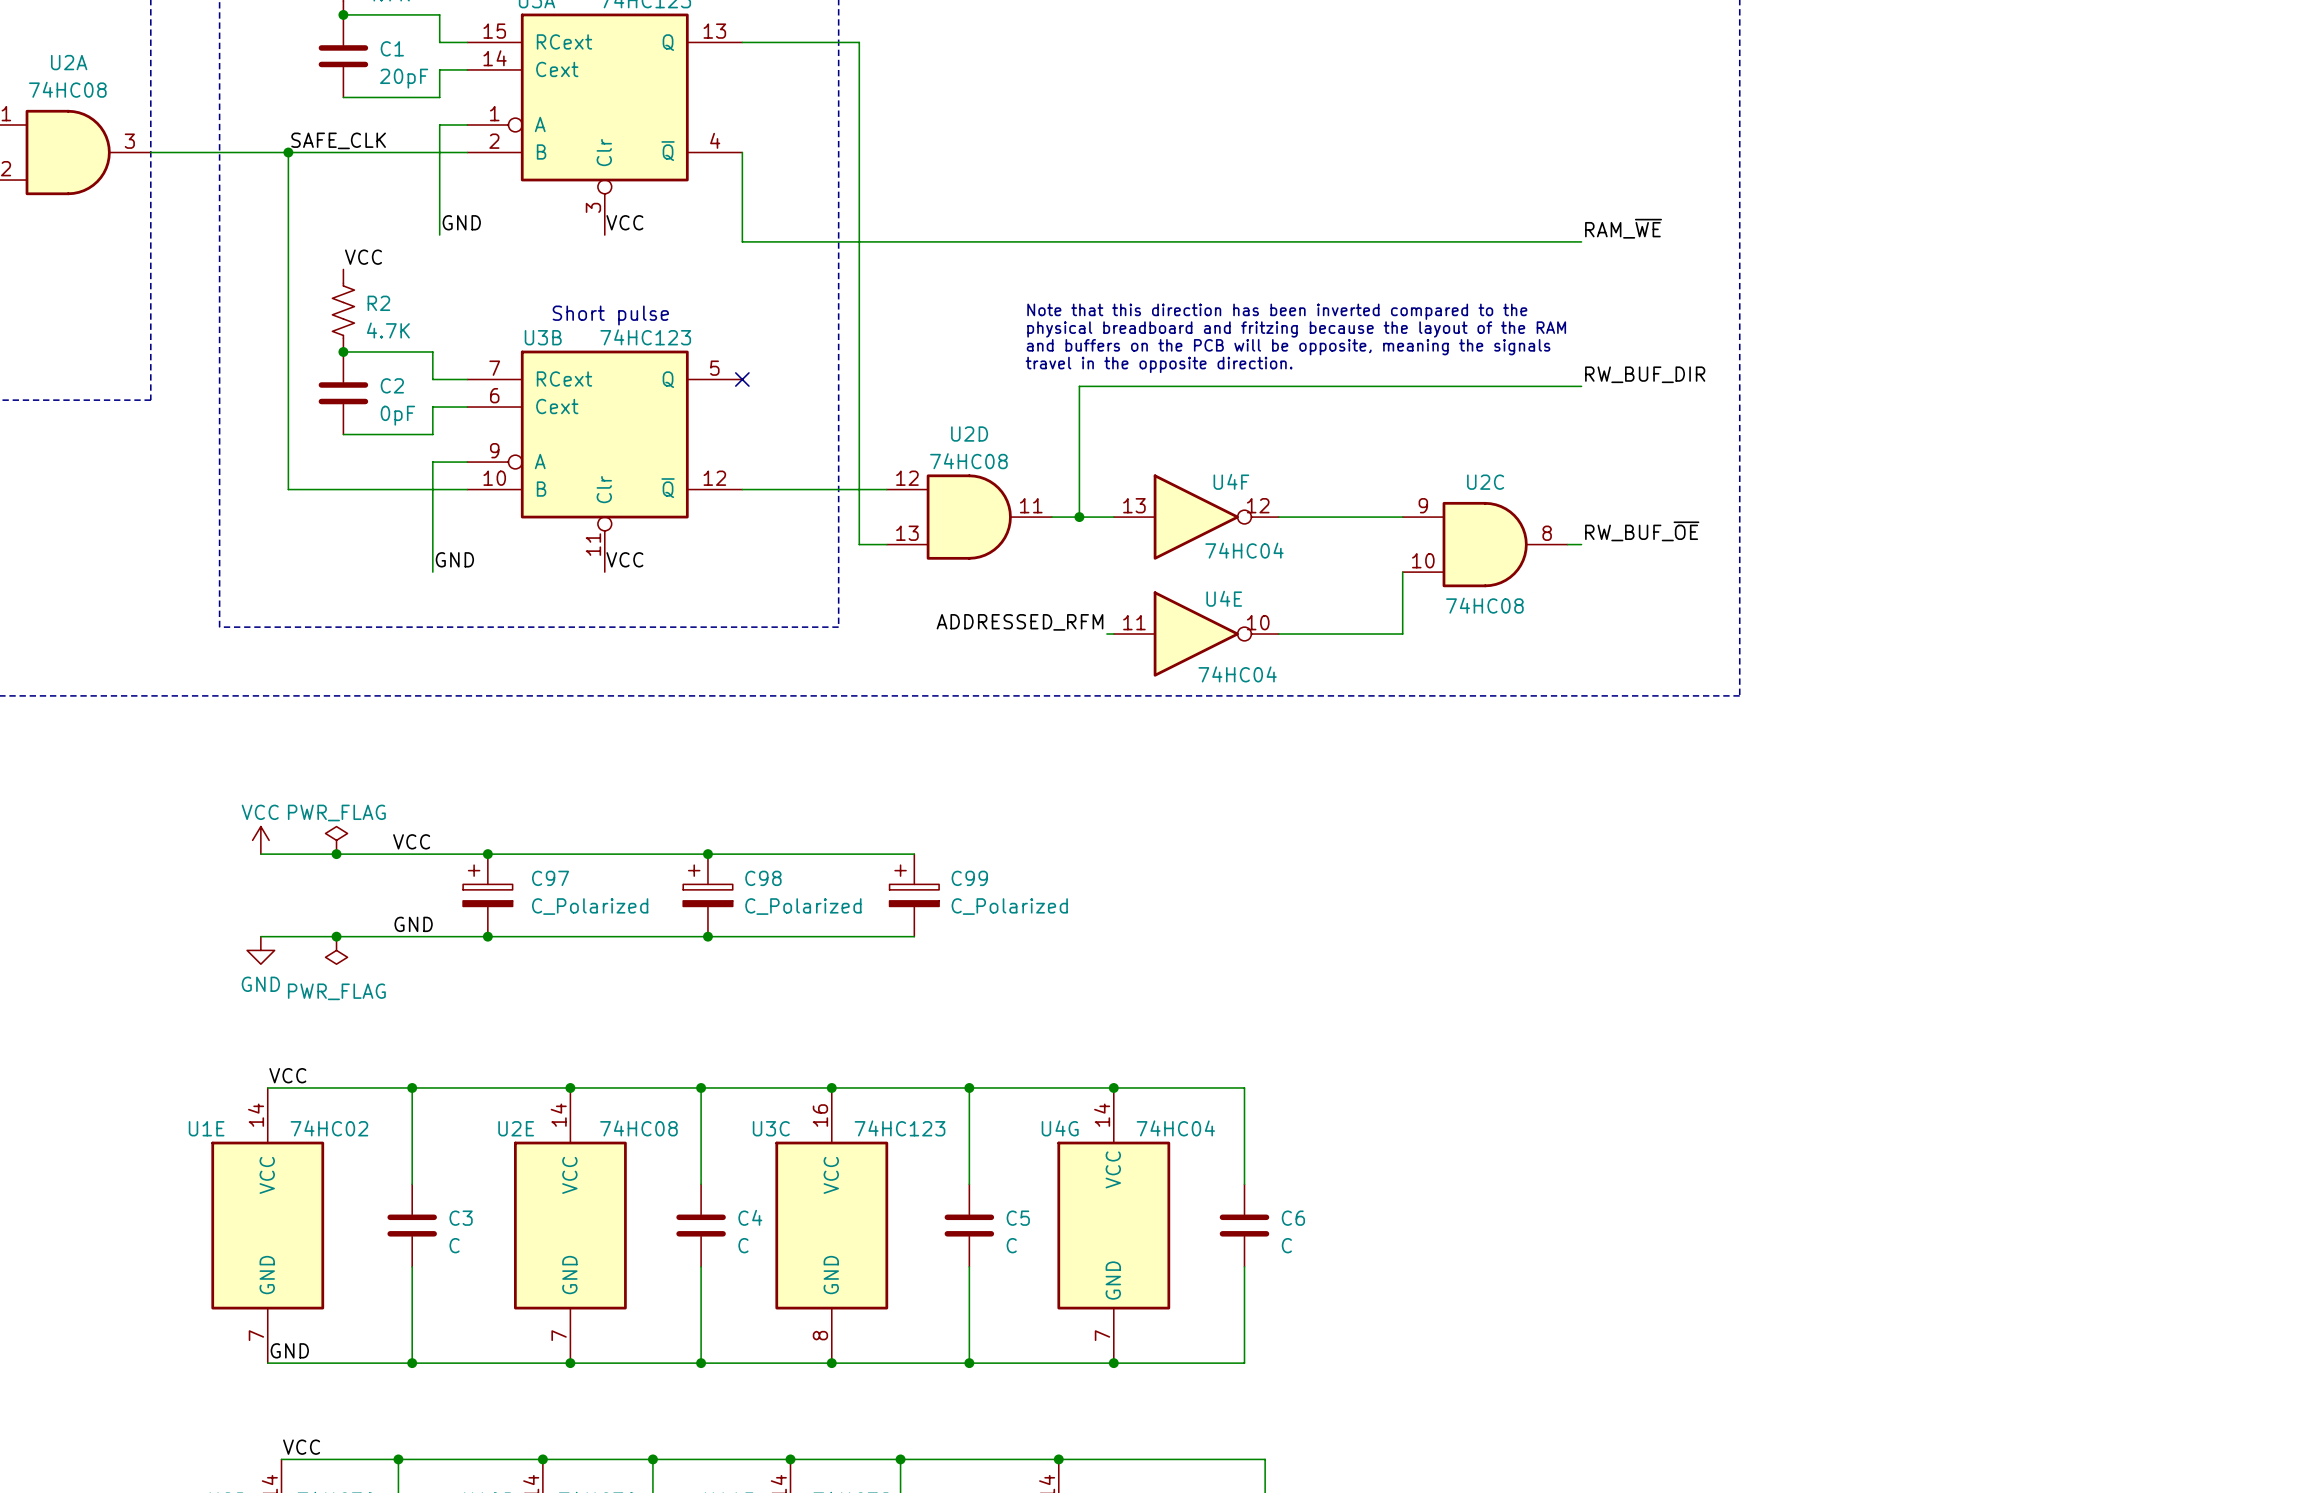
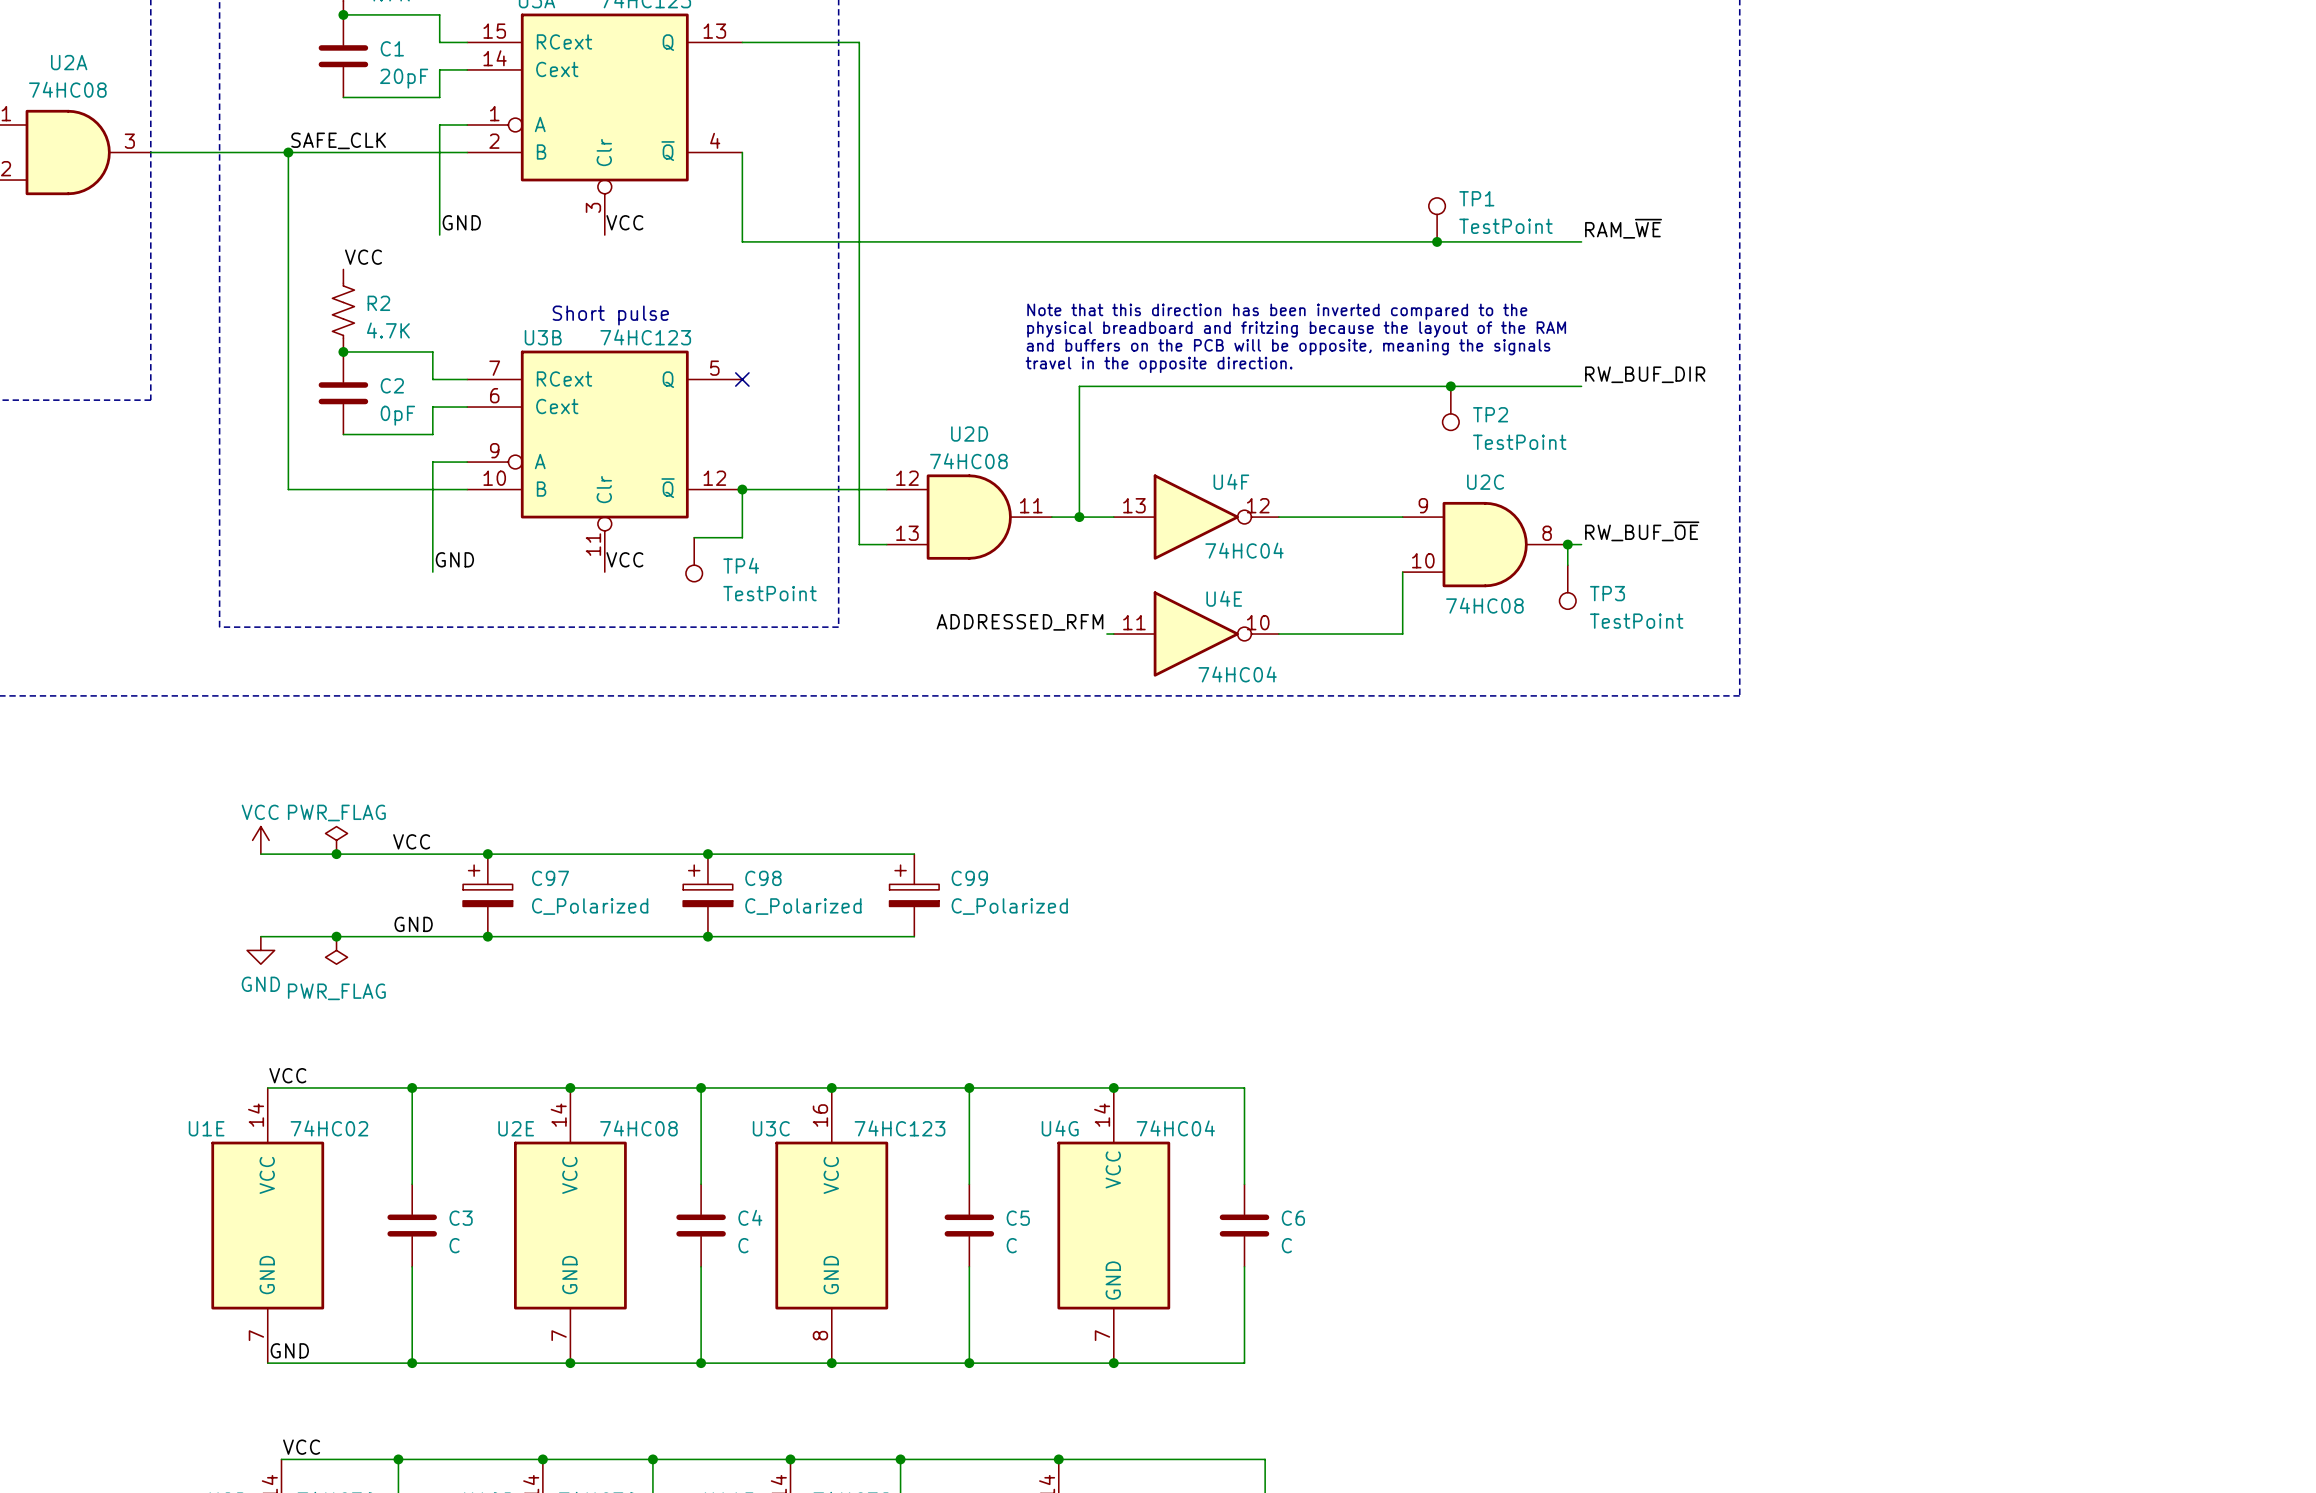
TP1: none -> TestPoint (1437, 219)
junction: none -> (1437, 241)
junction: none -> (1450, 386)
TP2: none -> TestPoint (1450, 408)
wire: none -> (742, 489) (742, 537) (694, 537)
junction: none -> (742, 489)
wire: none -> (1567, 544) (1567, 565)
junction: none -> (1567, 544)
TP4: none -> TestPoint (694, 559)
TP3: none -> TestPoint (1567, 587)

